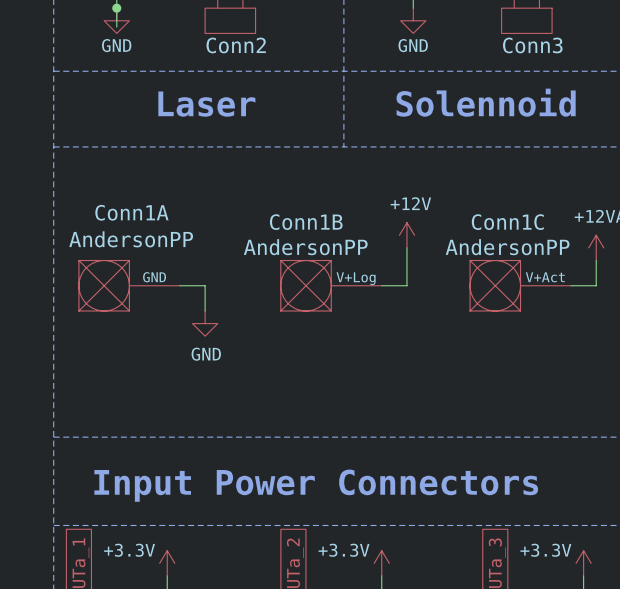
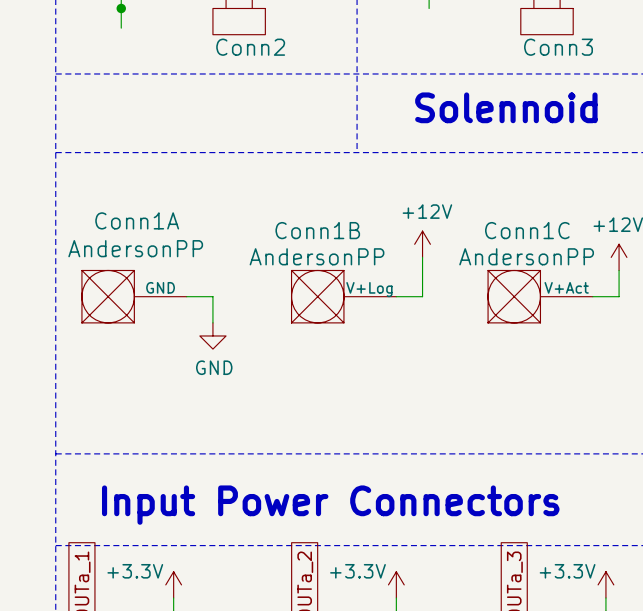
power symbol: GND (116, 20) -> none
power symbol: GND (413, 20) -> none
text: Laser (206, 104) -> none

